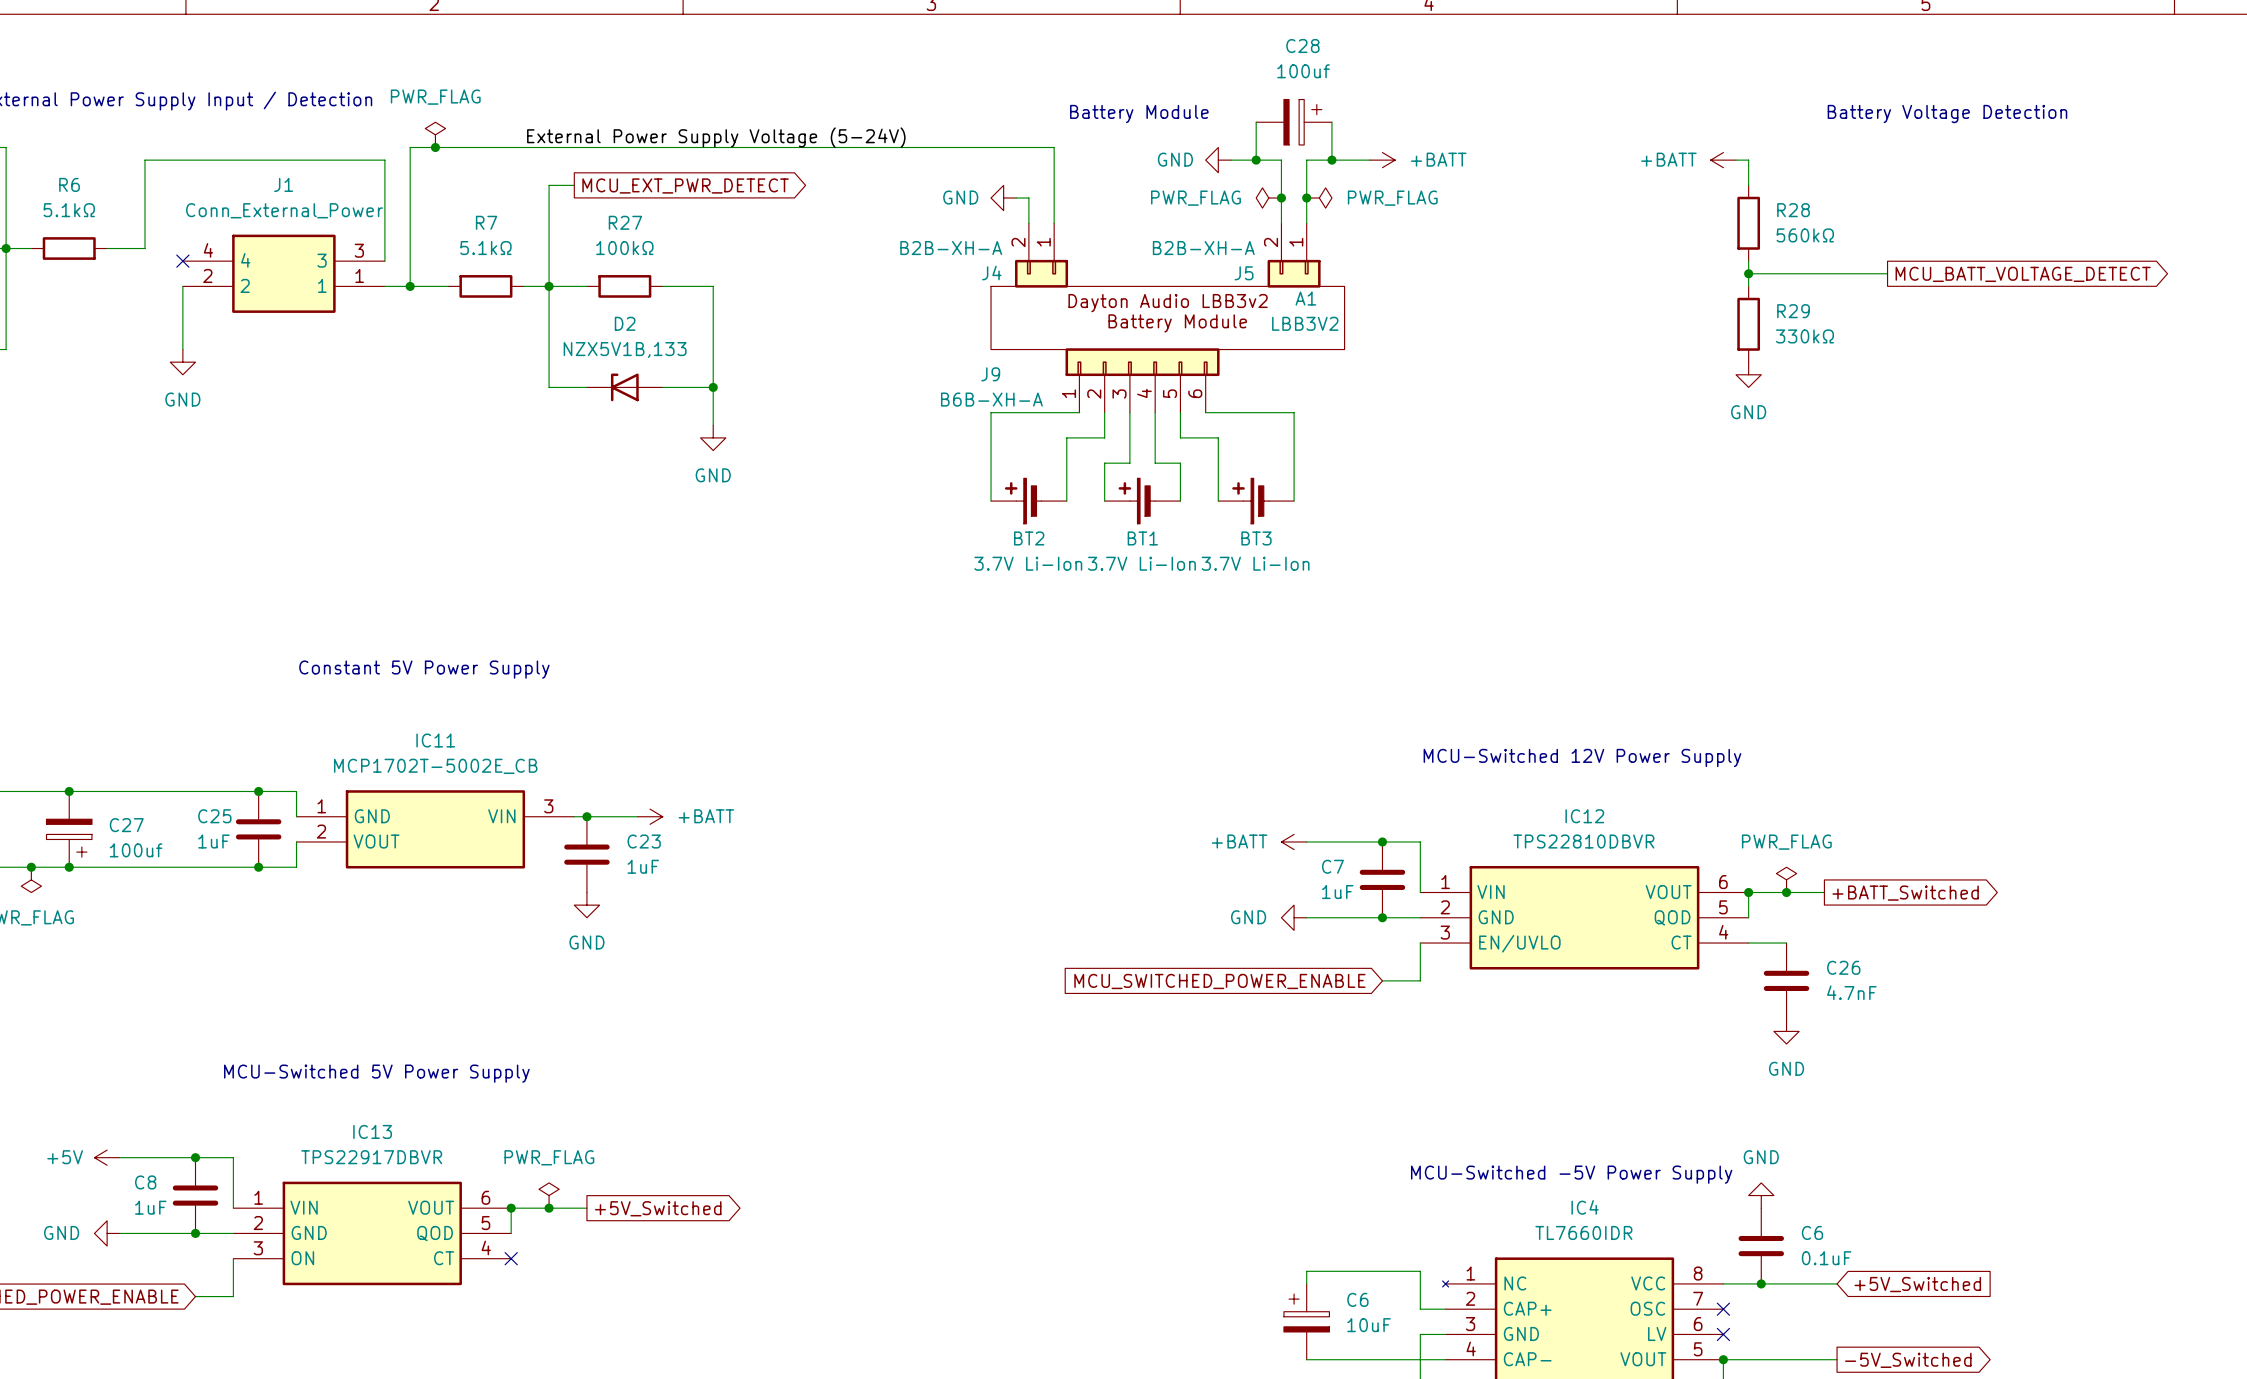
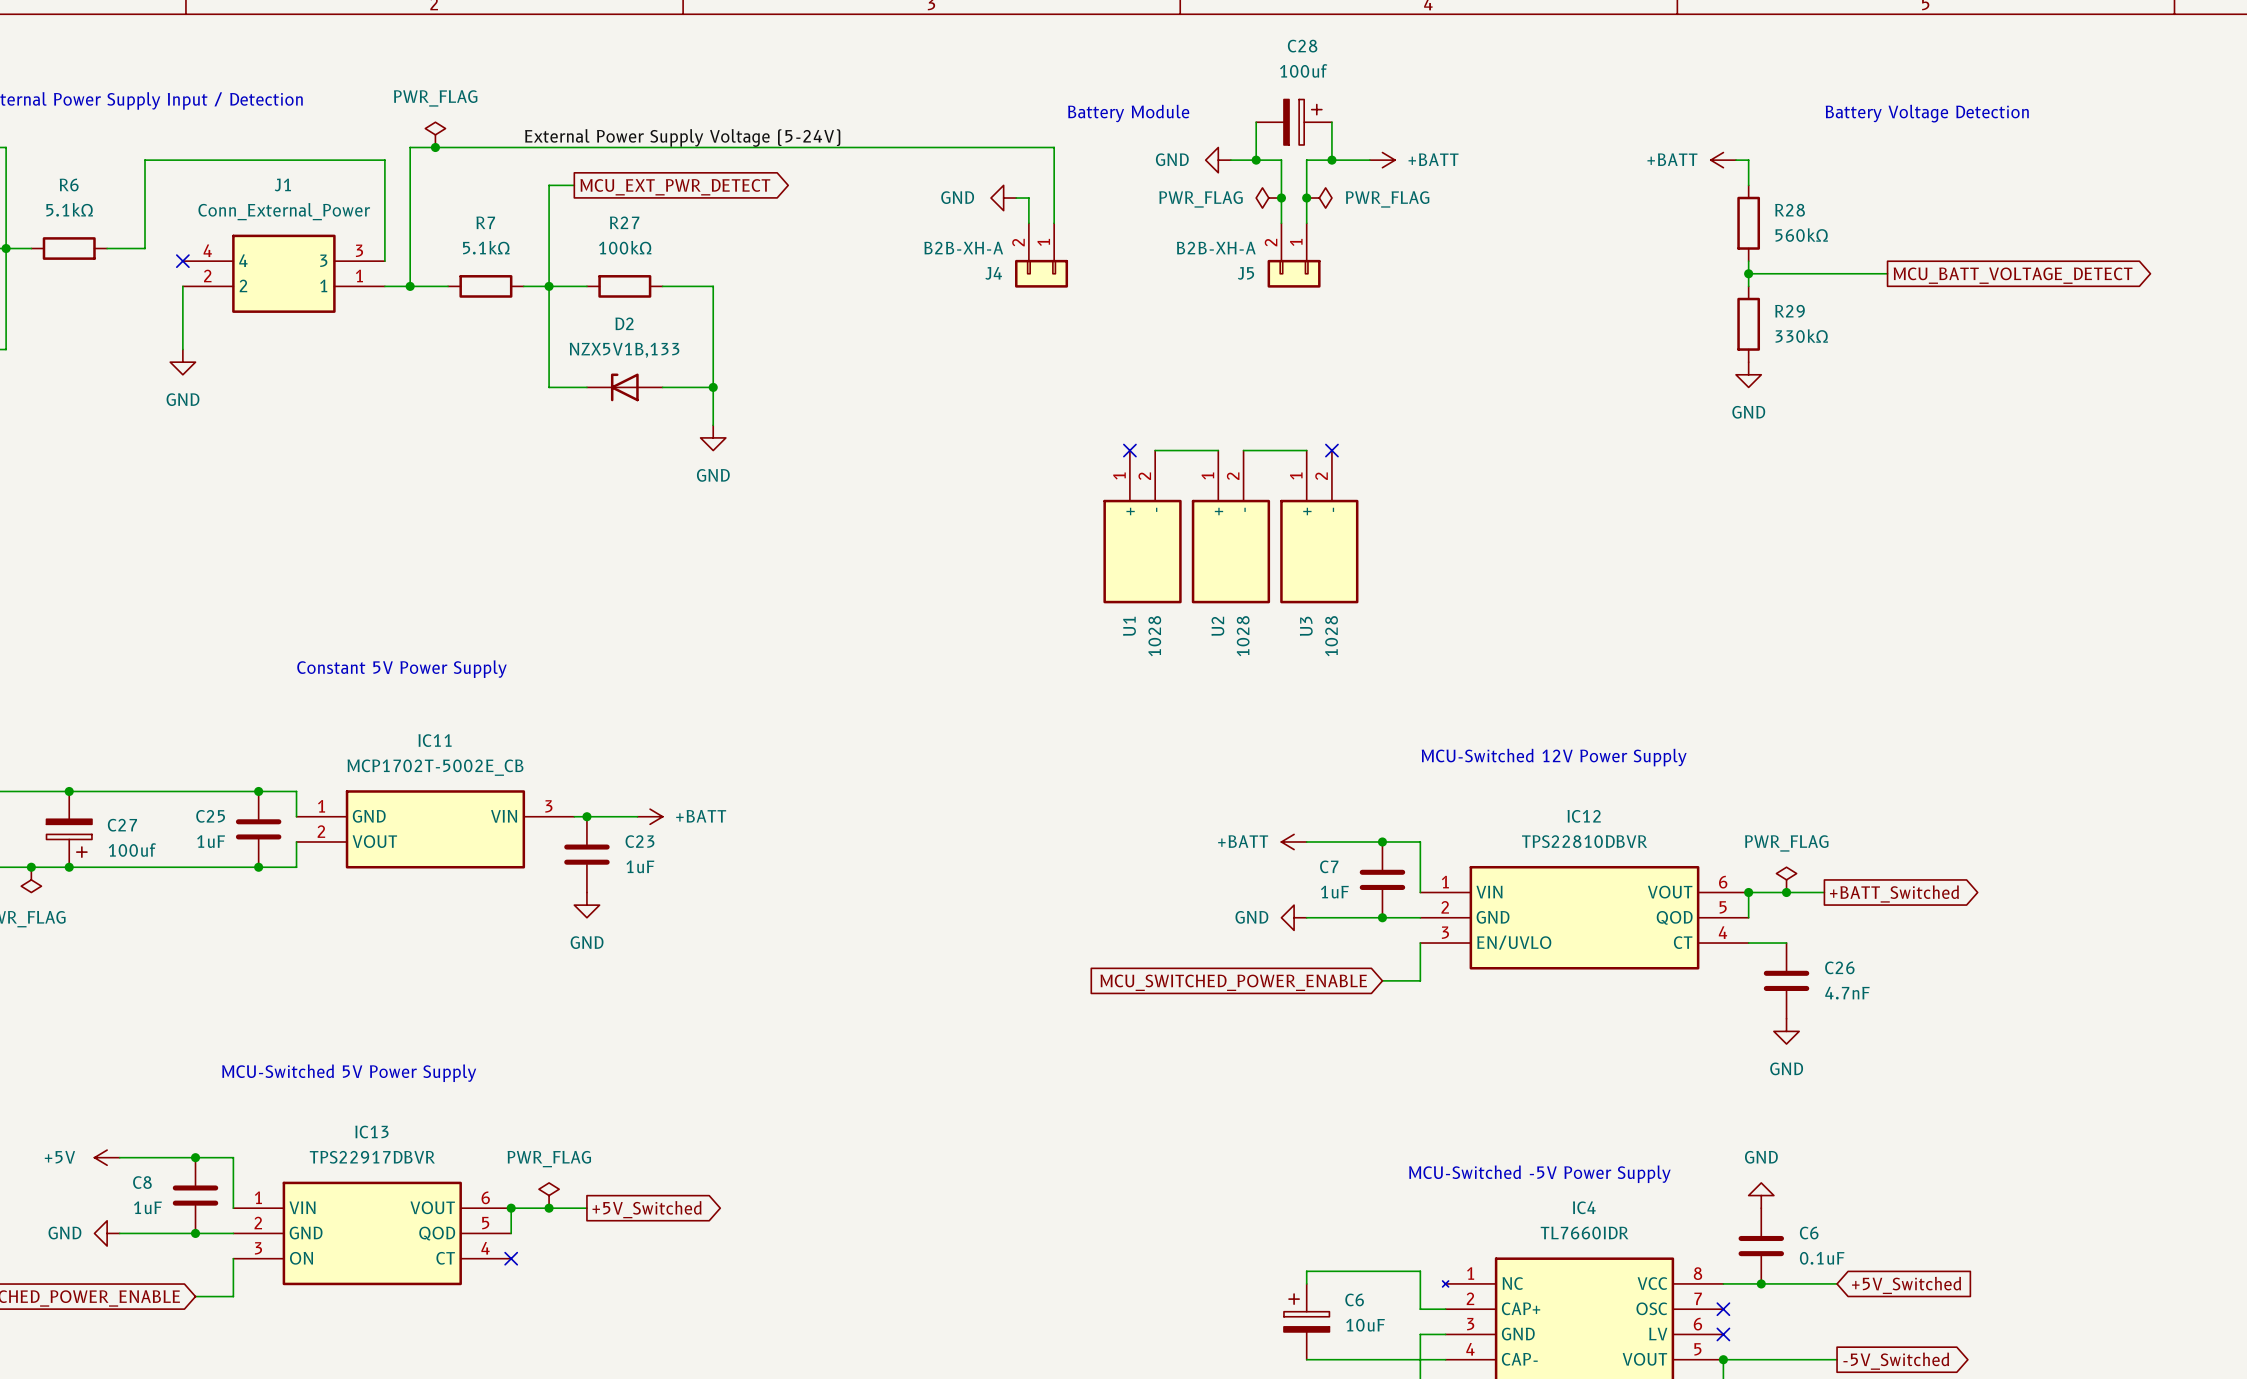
A1: LBB3V2 (1167, 317) -> none
J9: B6B-XH-A (1142, 380) -> none
wire: (1079, 412) (991, 412) (991, 501) -> none
wire: (1104, 412) (1104, 437) (1066, 437) (1066, 501) -> none
wire: (1129, 412) (1129, 463) (1104, 463) (1104, 501) -> none
wire: (1155, 412) (1155, 463) (1180, 463) (1180, 501) -> none
wire: (1180, 412) (1180, 437) (1218, 437) (1218, 501) -> none
wire: (1205, 412) (1294, 412) (1294, 501) -> none
no-connect mark: none -> (1129, 450)
wire: none -> (1155, 450) (1218, 450)
wire: none -> (1243, 450) (1306, 450)
no-connect mark: none -> (1331, 450)
BT2: 3.7V Li-Ion (1028, 501) -> none
BT1: 3.7V Li-Ion (1142, 501) -> none
BT3: 3.7V Li-Ion (1256, 501) -> none
U1: none -> 1028 (1142, 526)
U2: none -> 1028 (1230, 526)
U3: none -> 1028 (1319, 526)

